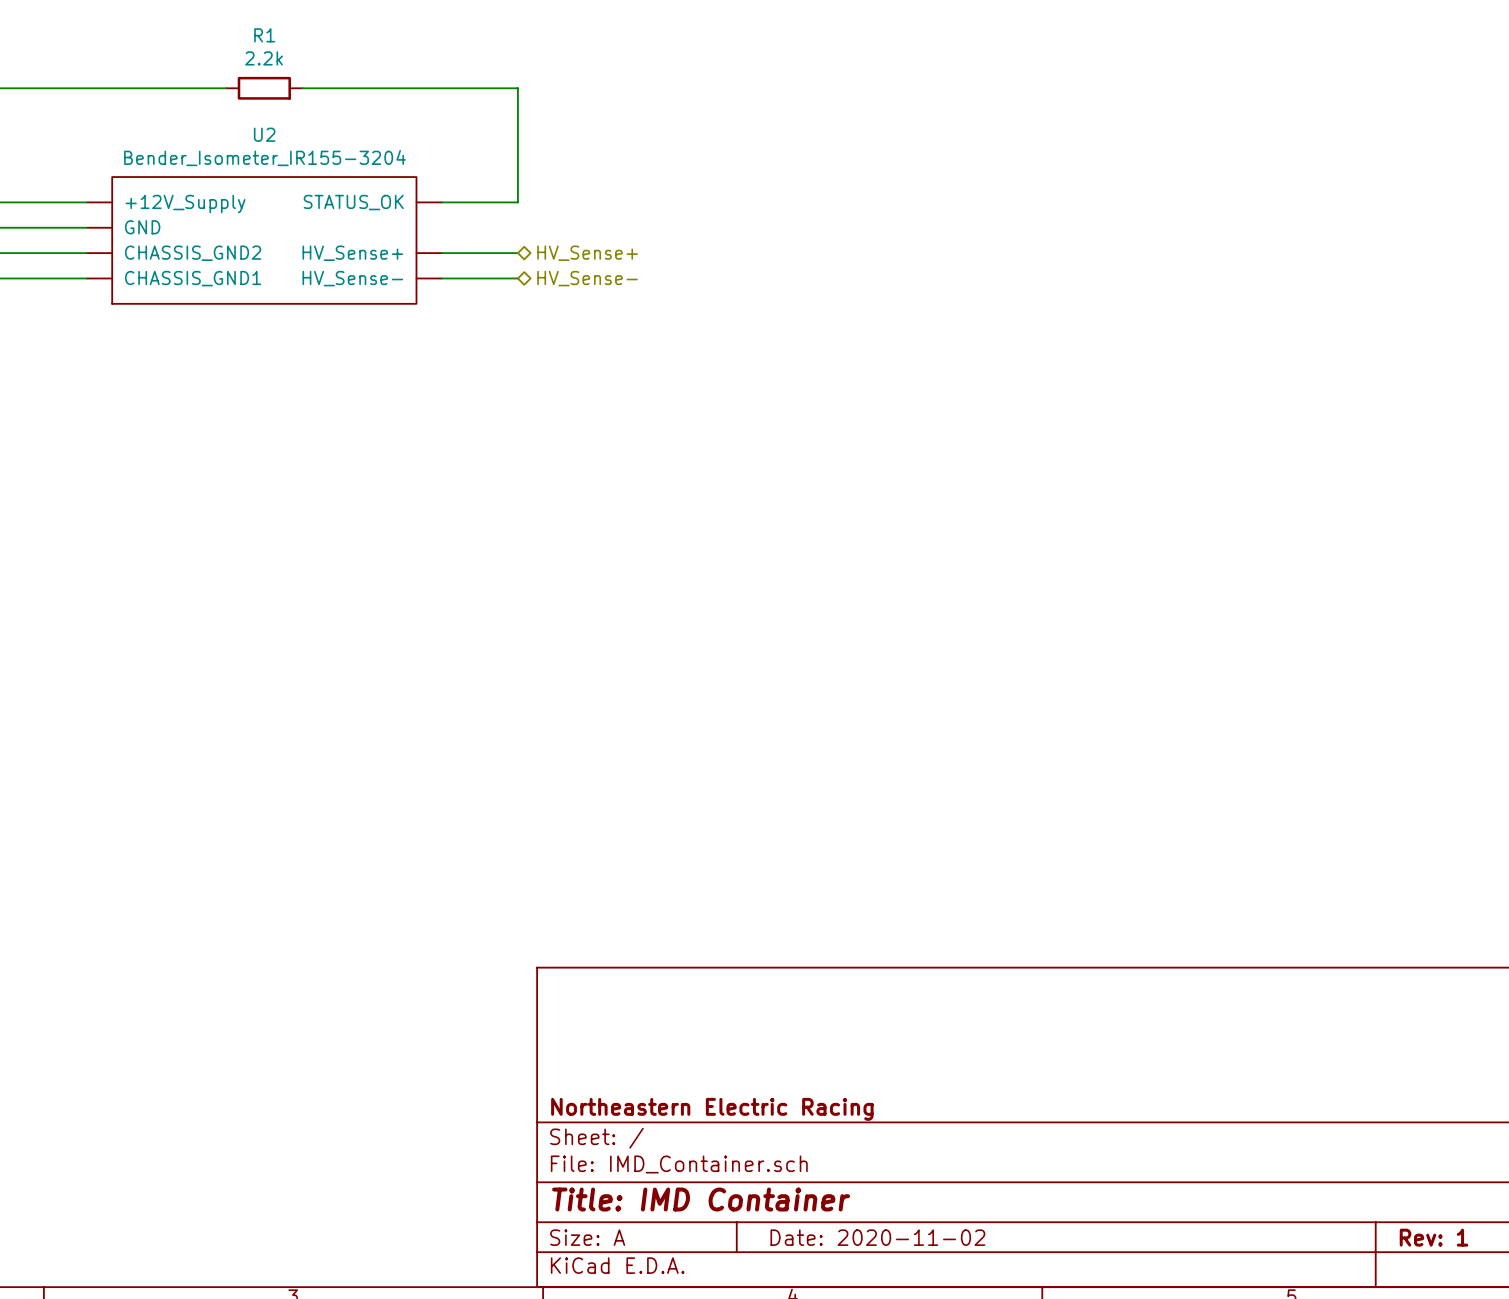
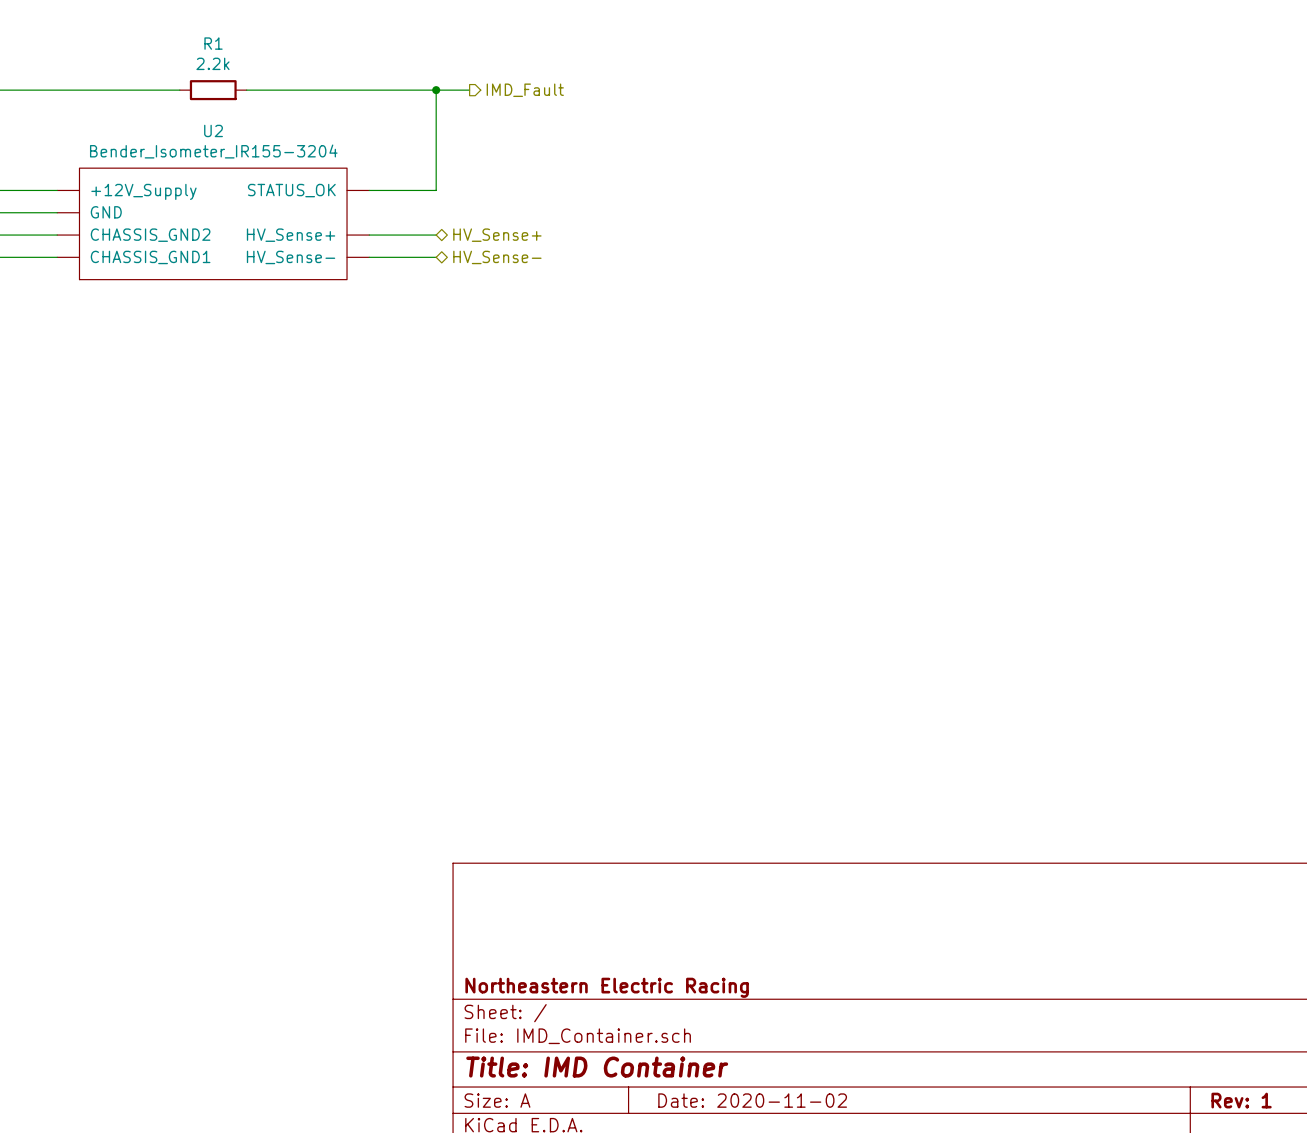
wire: none -> (436, 90) (469, 90)
junction: none -> (436, 90)
hierarchical label: none -> IMD_Fault (525, 90)

